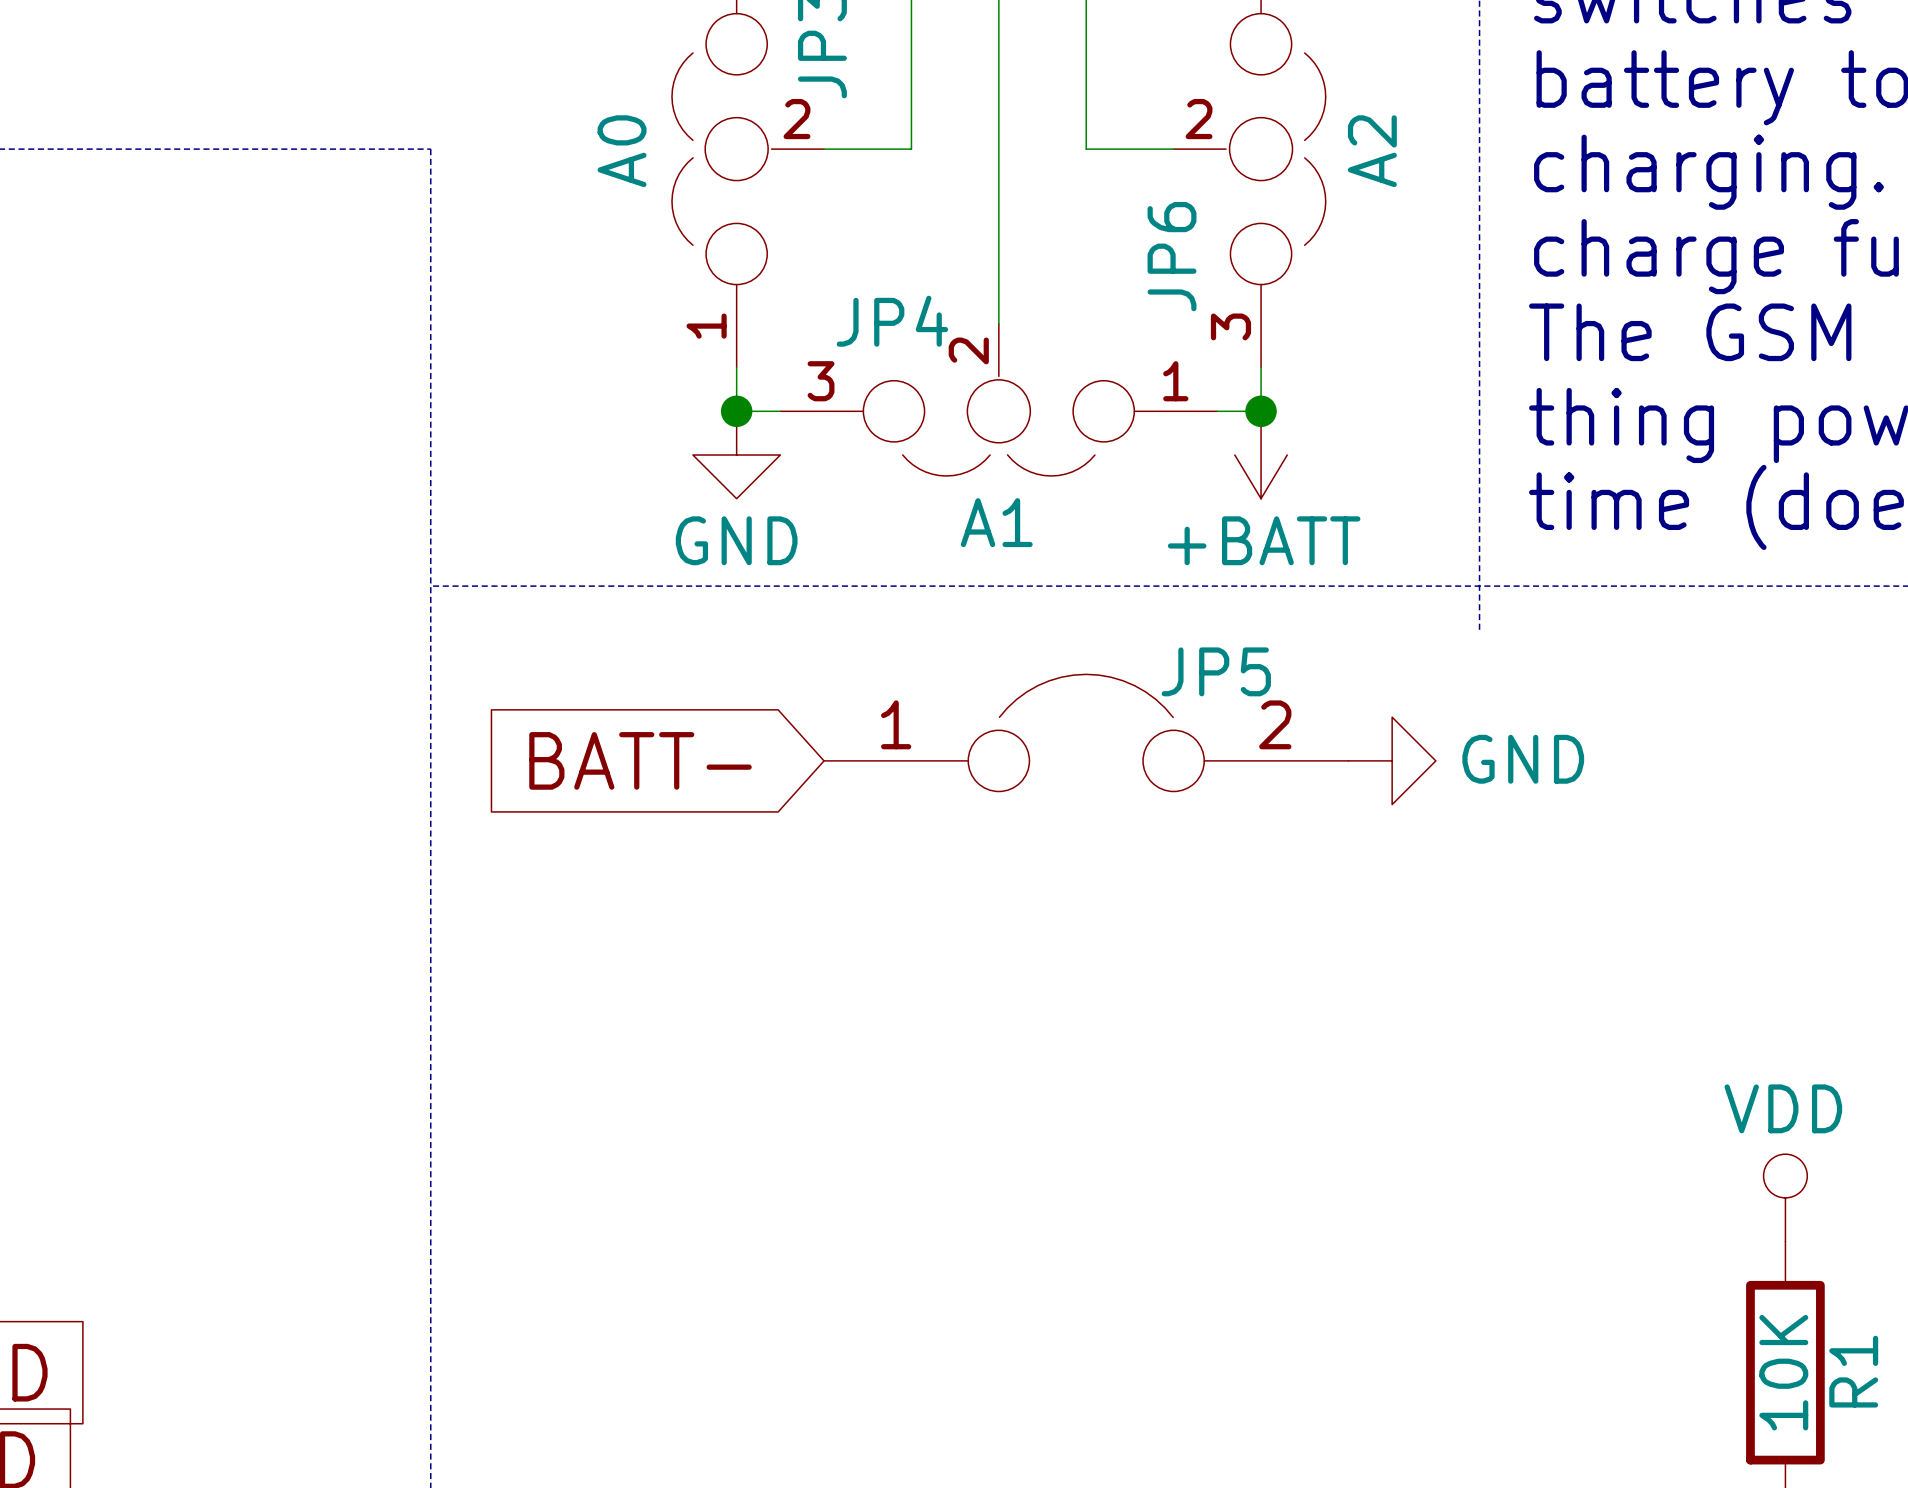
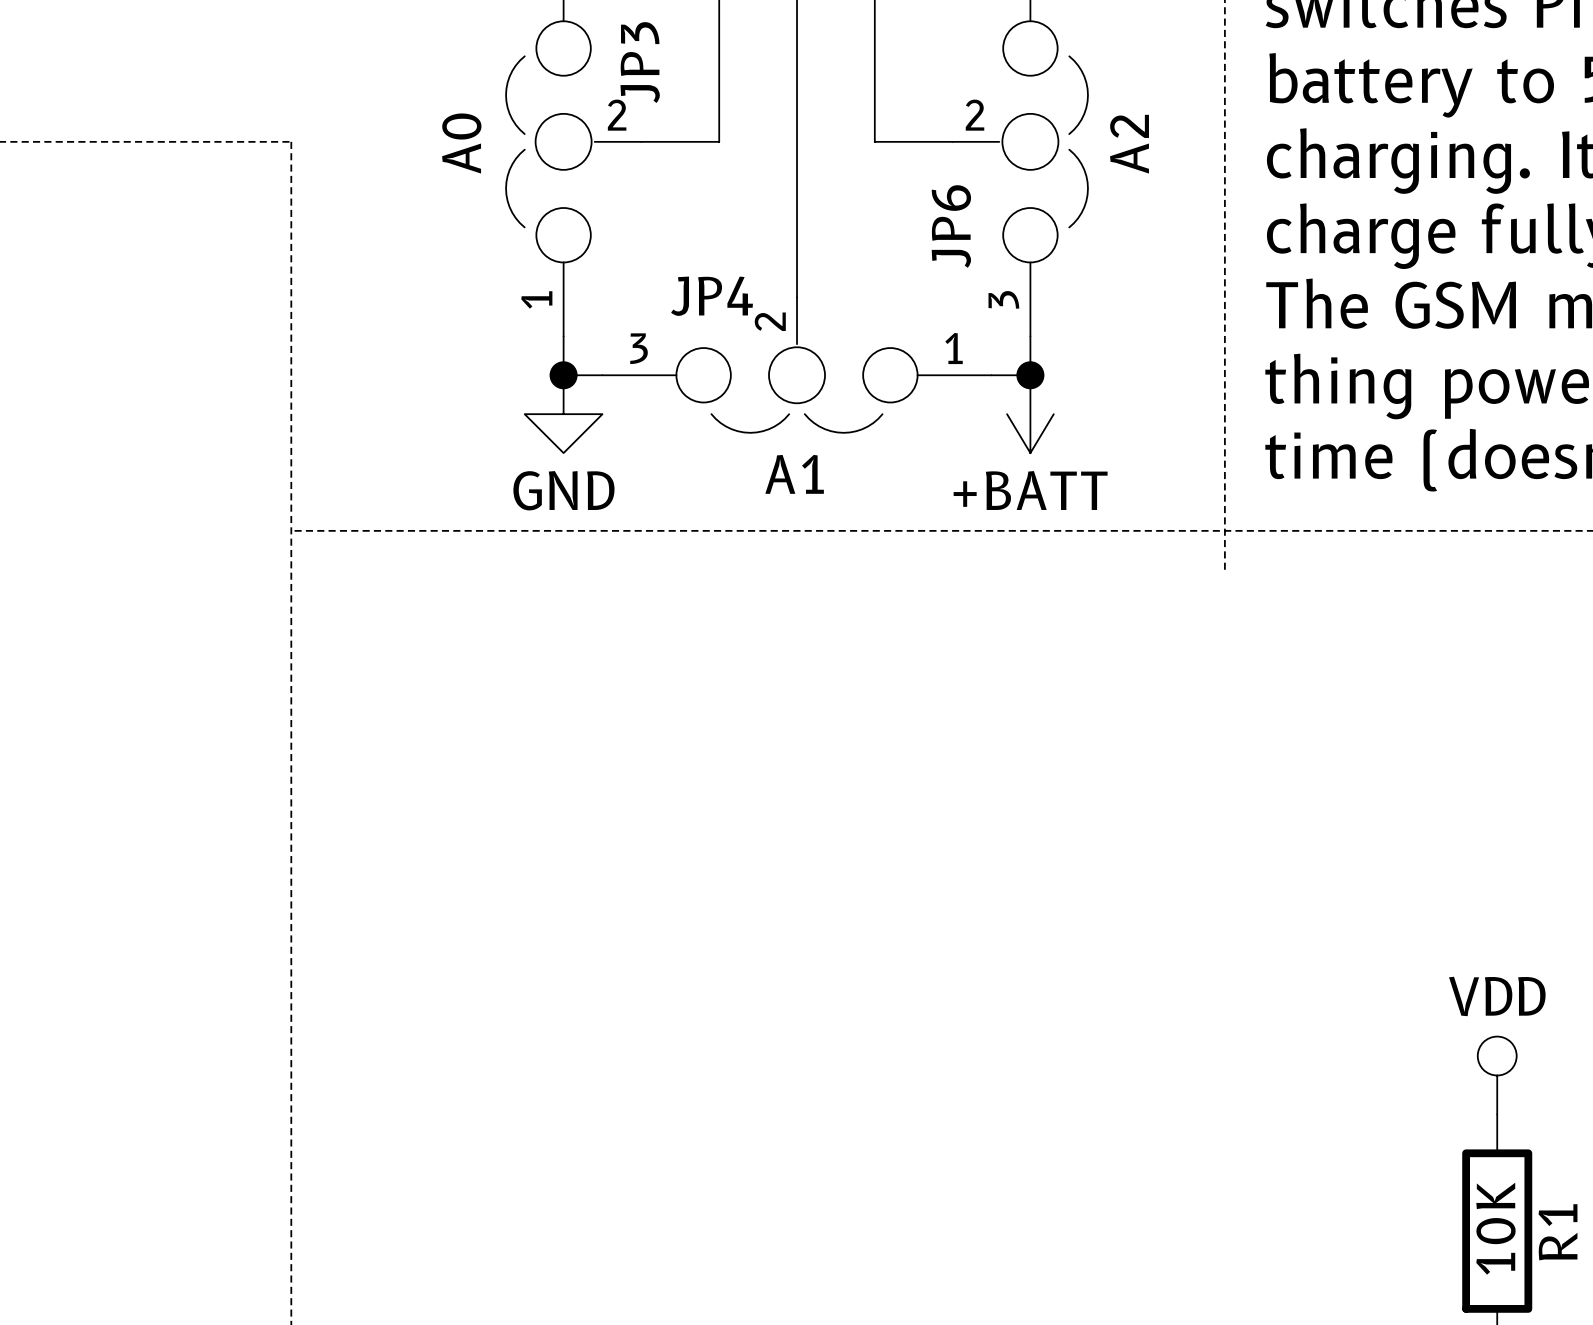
JP5: (1086, 732) -> none
global label: BATT- (640, 760) -> none
power symbol: GND (1392, 760) -> none

